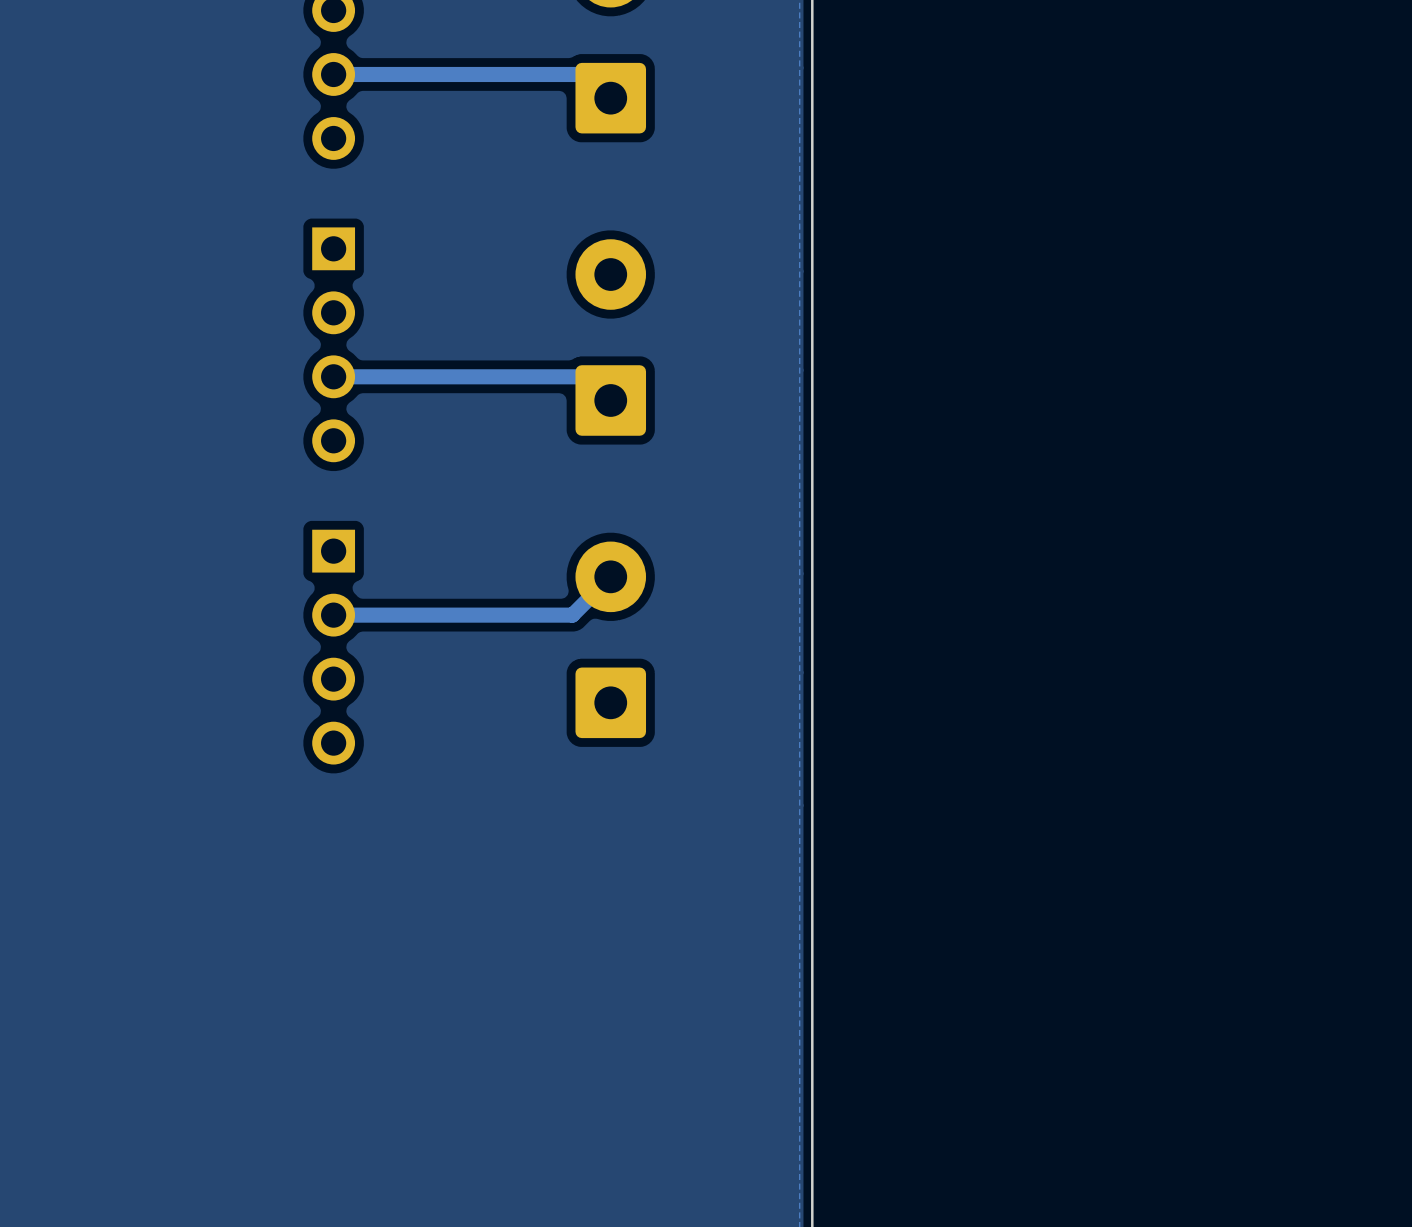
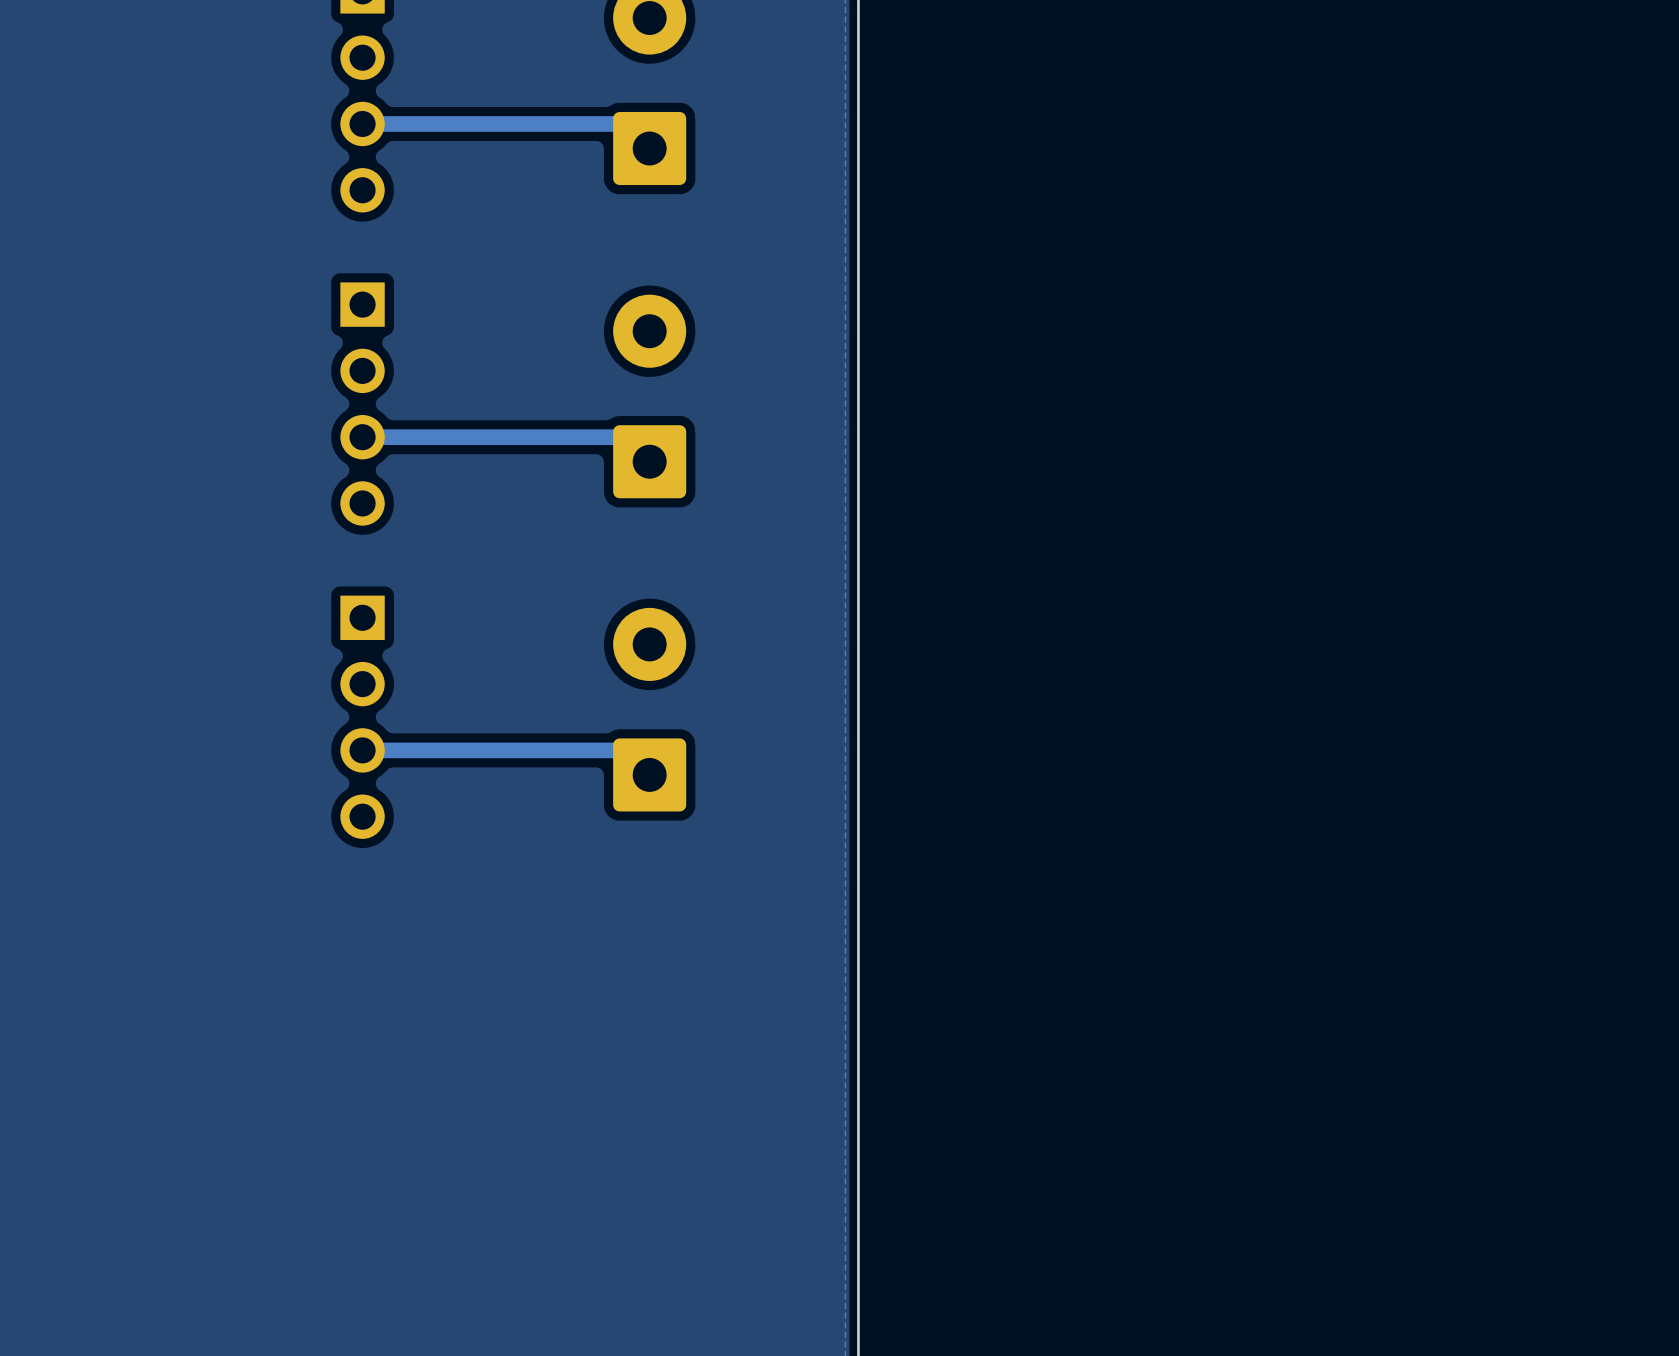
track: (610, 576) (572, 615) (333, 615) -> none
track: none -> (362, 750) (625, 750) (649, 774)

